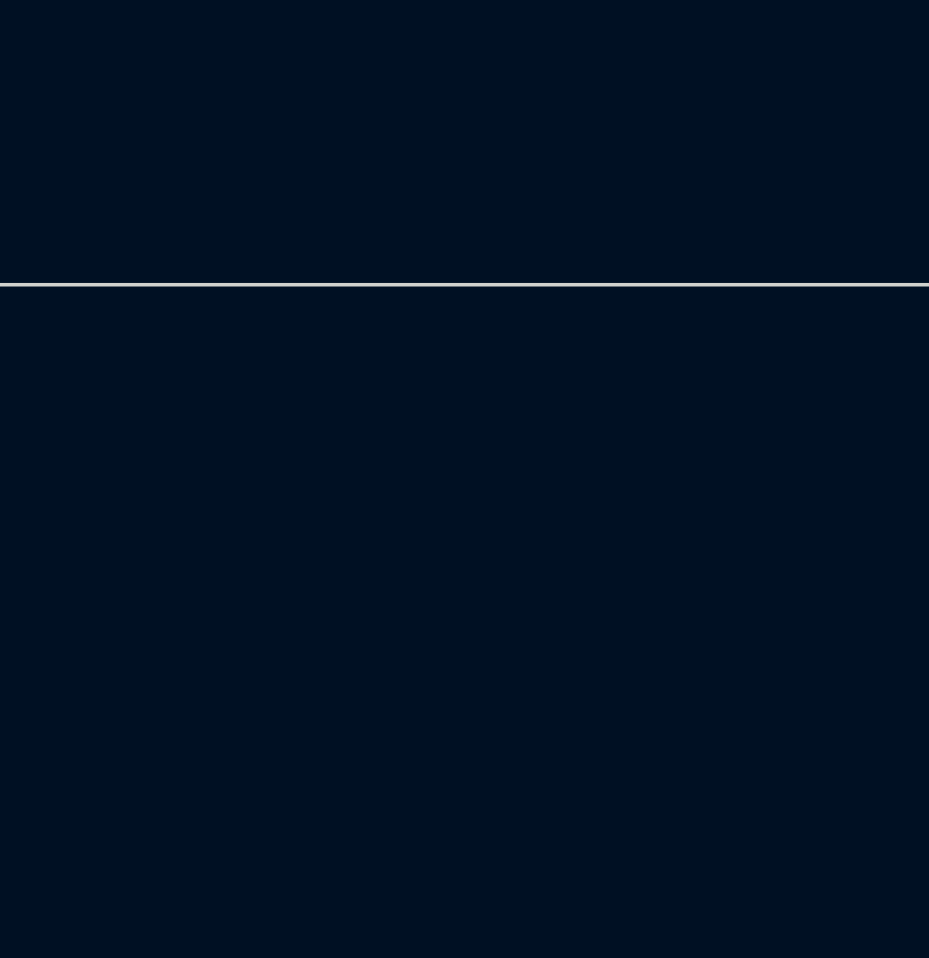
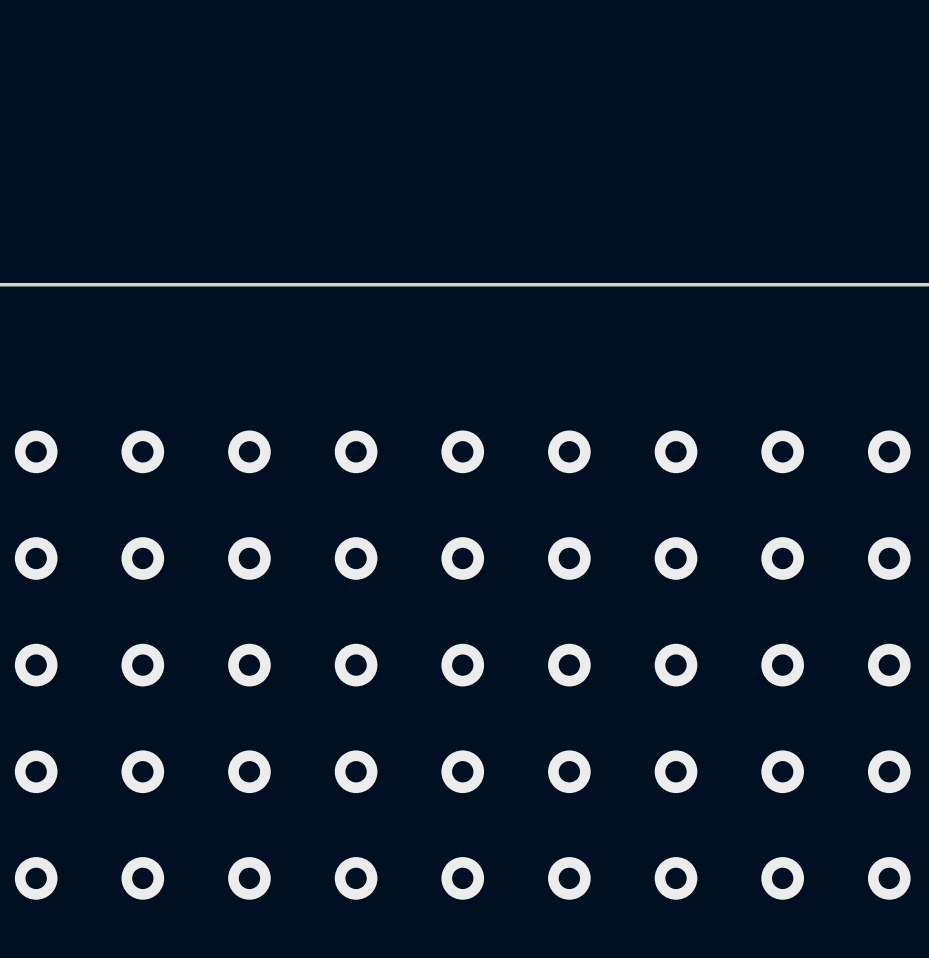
via: none -> (36, 451)
via: none -> (142, 451)
via: none -> (249, 451)
via: none -> (356, 451)
via: none -> (462, 451)
via: none -> (569, 451)
via: none -> (676, 451)
via: none -> (782, 451)
via: none -> (889, 451)
via: none -> (36, 558)
via: none -> (142, 558)
via: none -> (249, 558)
via: none -> (356, 558)
via: none -> (462, 558)
via: none -> (569, 558)
via: none -> (676, 558)
via: none -> (782, 558)
via: none -> (889, 558)
via: none -> (36, 665)
via: none -> (142, 665)
via: none -> (249, 665)
via: none -> (356, 665)
via: none -> (462, 665)
via: none -> (569, 665)
via: none -> (676, 665)
via: none -> (782, 665)
via: none -> (889, 665)
via: none -> (36, 771)
via: none -> (142, 771)
via: none -> (249, 771)
via: none -> (356, 771)
via: none -> (462, 771)
via: none -> (569, 771)
via: none -> (676, 771)
via: none -> (782, 771)
via: none -> (889, 771)
via: none -> (36, 878)
via: none -> (142, 878)
via: none -> (249, 878)
via: none -> (356, 878)
via: none -> (462, 878)
via: none -> (569, 878)
via: none -> (676, 878)
via: none -> (782, 878)
via: none -> (889, 878)

